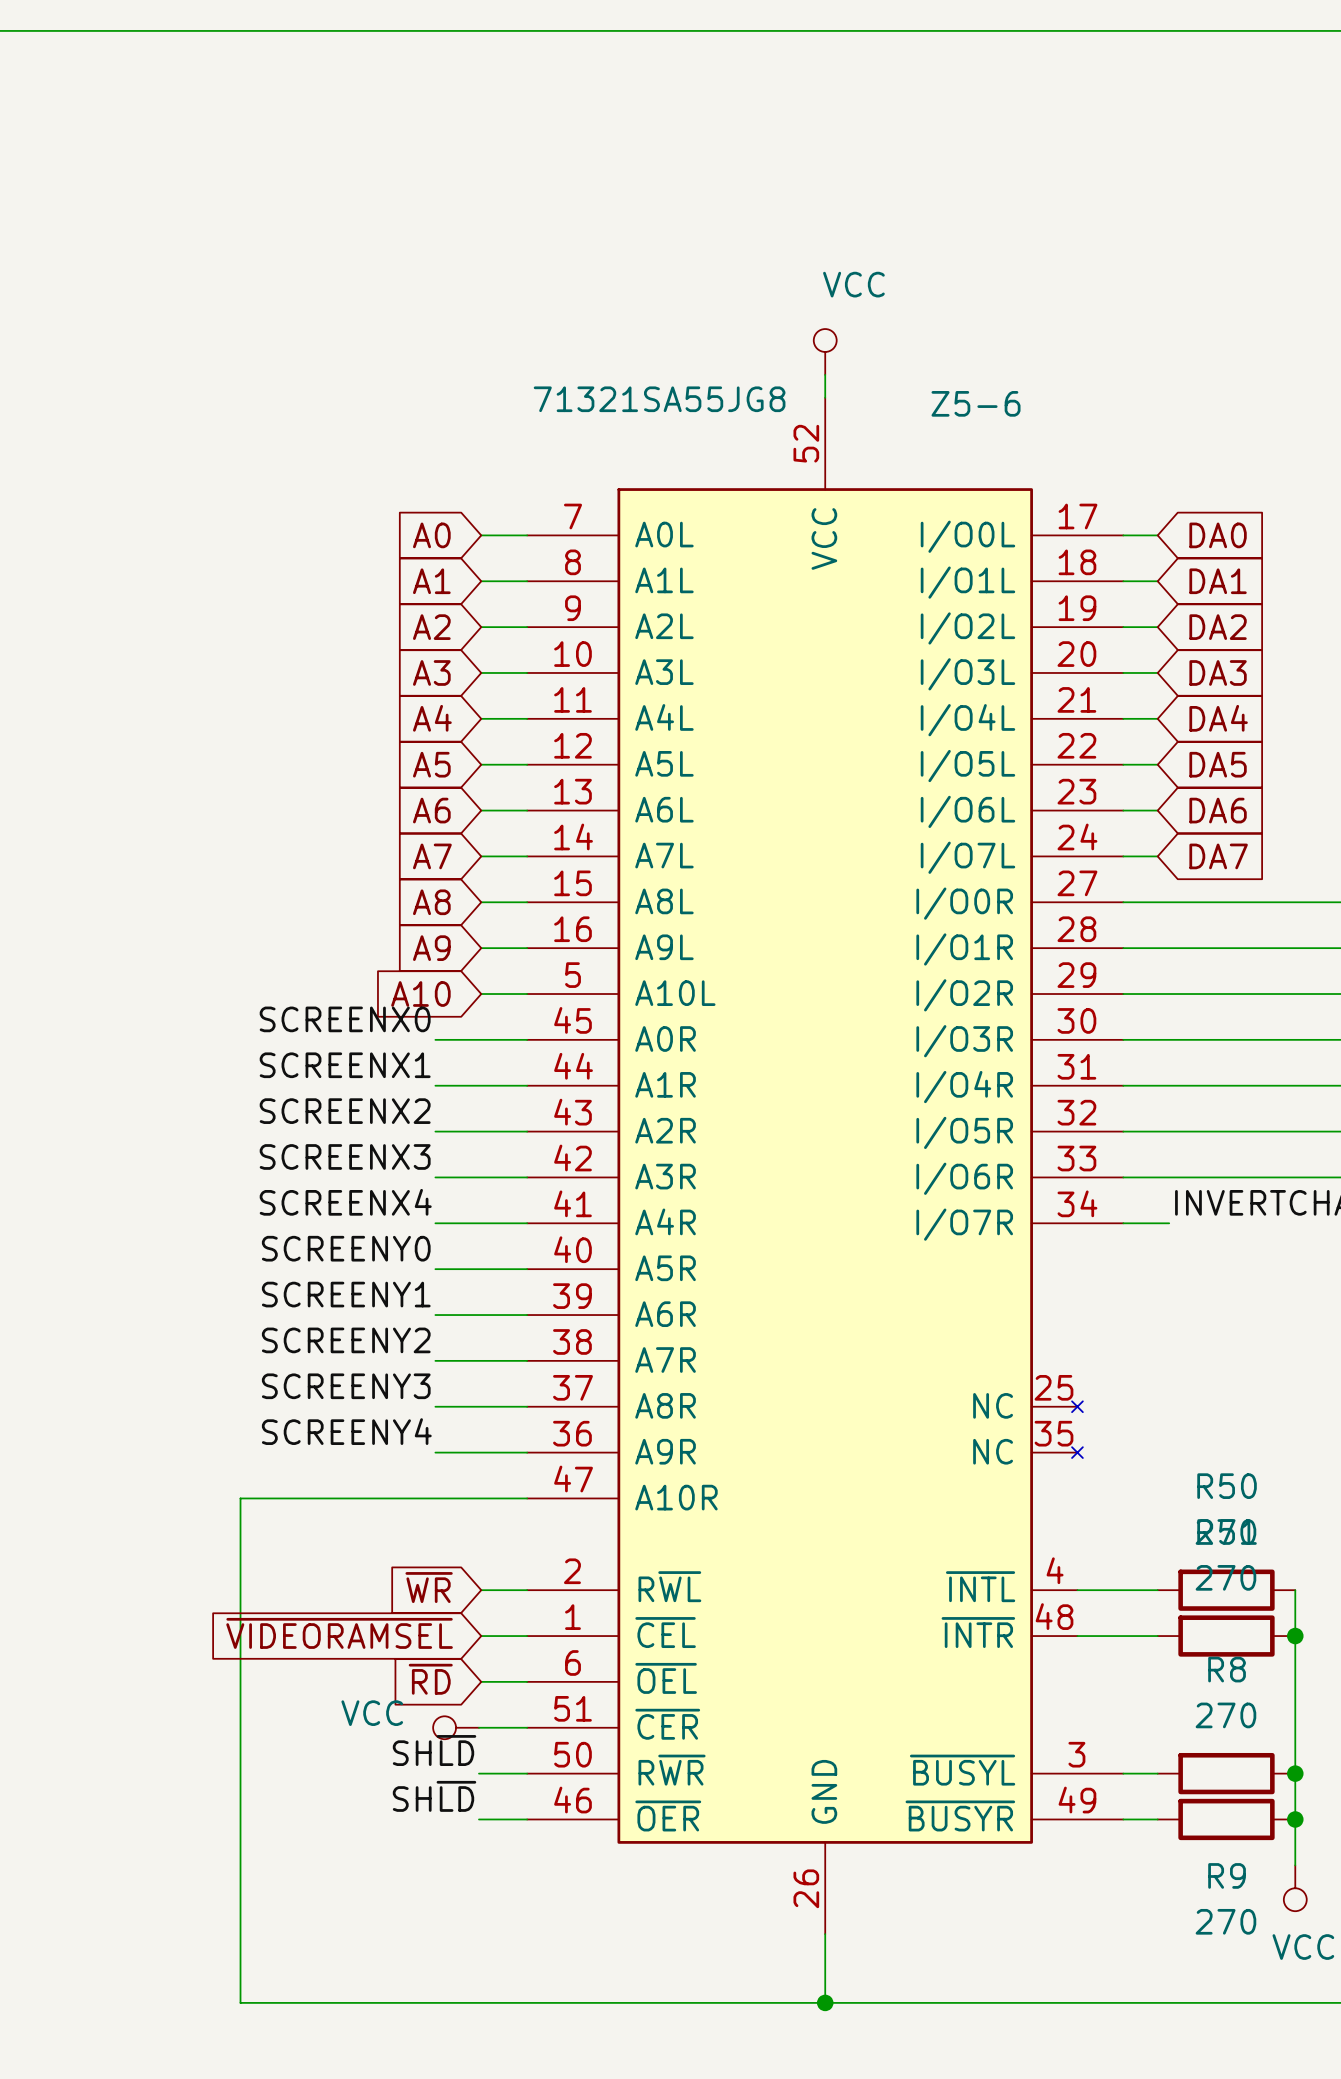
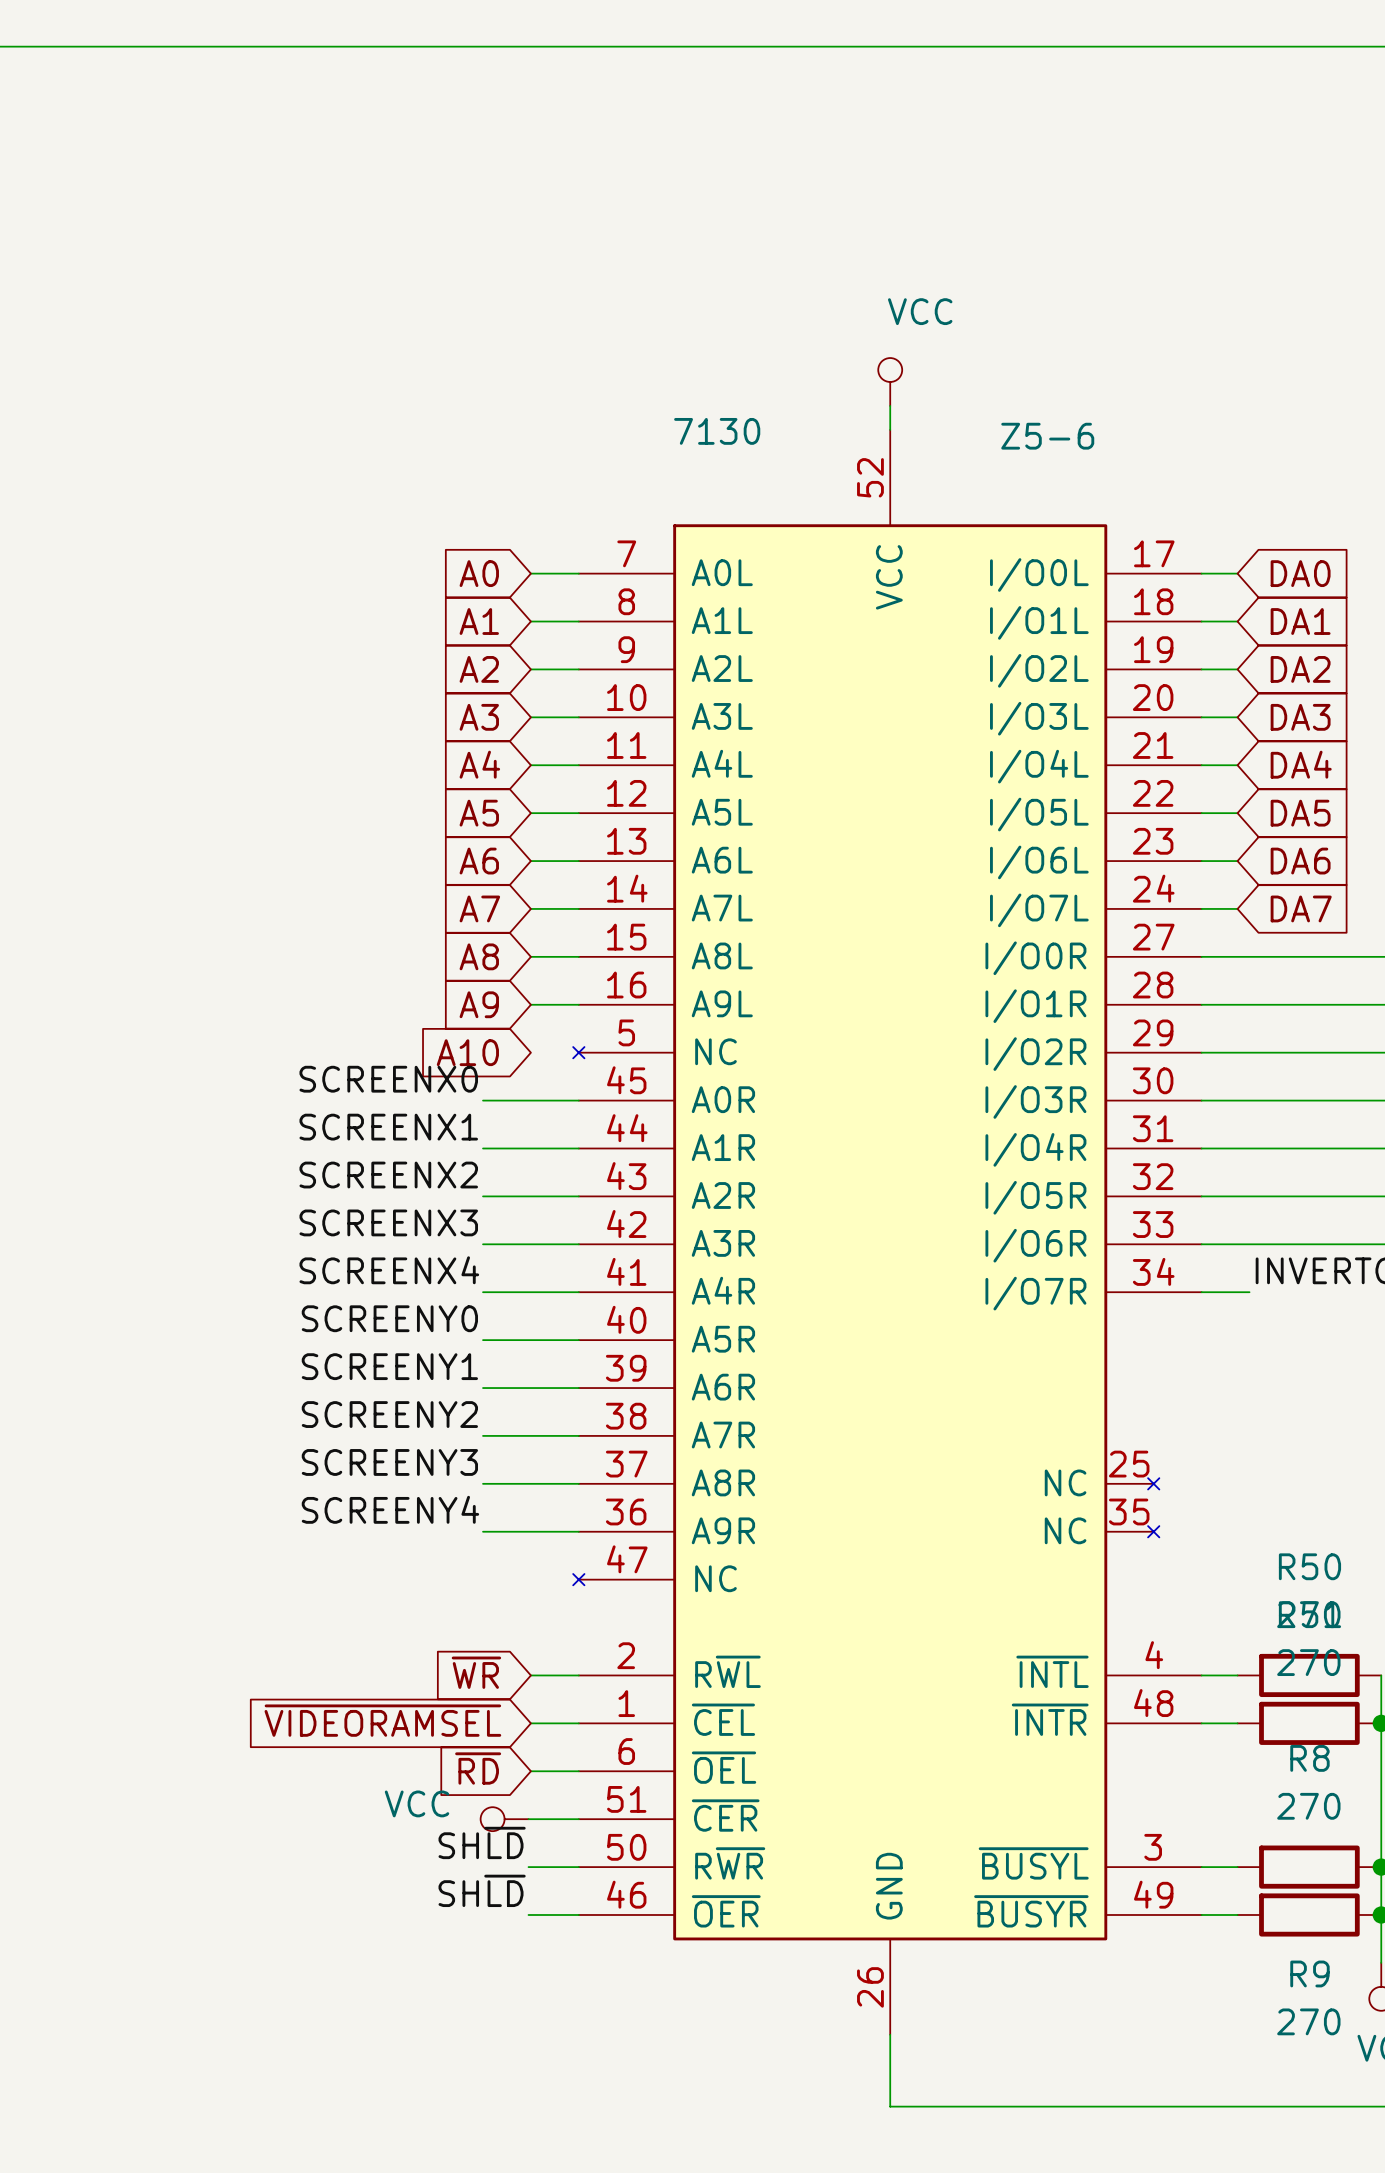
Z5-6 symbol: [527, 397, 1124, 1935] -> [573, 429, 1202, 2035]
Z5-6 value: 71321SA55JG8 (659, 399) -> 7130 (717, 431)
wire: (481, 994) (527, 994) -> none
wire: (527, 1498) (240, 1498) (240, 2002) (825, 2002) -> none
junction: (825, 2002) -> none

